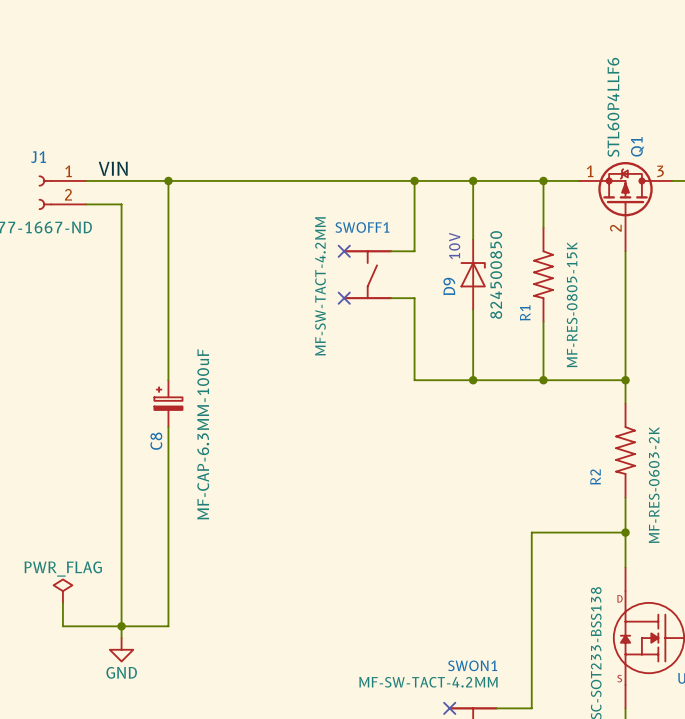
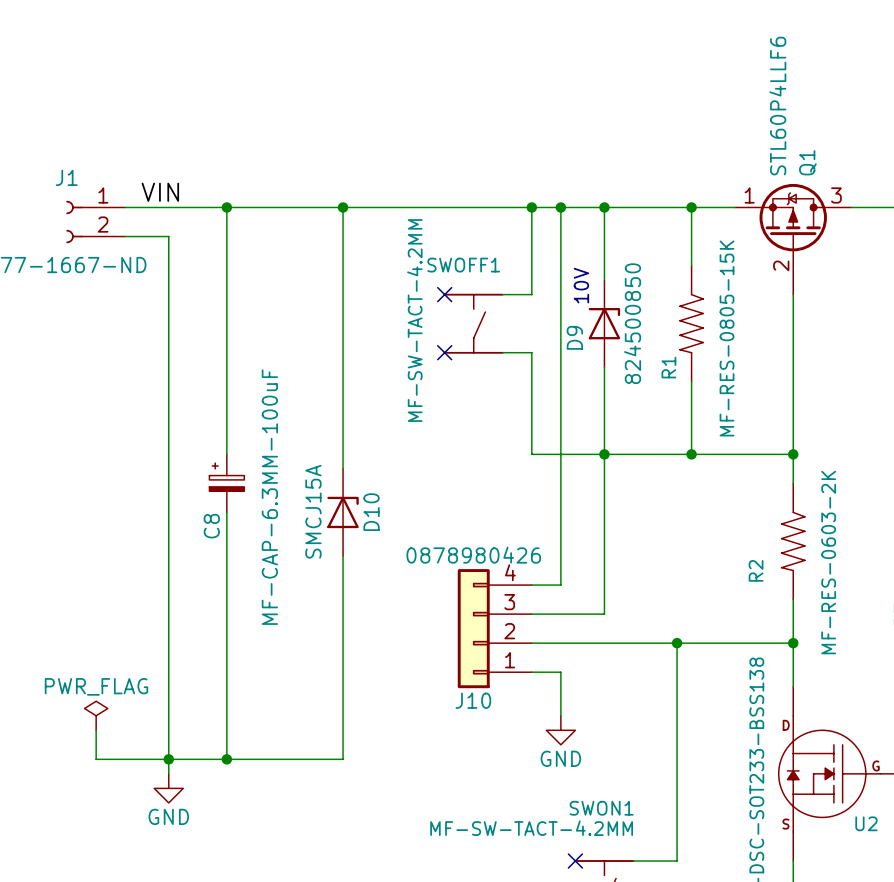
wire: none -> (343, 207) (343, 468)
junction: none -> (343, 207)
wire: none -> (560, 207) (560, 585) (531, 585)
junction: none -> (560, 207)
wire: none -> (604, 454) (604, 614) (531, 614)
D10: none -> SMCJ15A (343, 512)
wire: none -> (343, 556) (343, 759) (226, 759)
J10: none -> 0878980426 (494, 628)
wire: none -> (531, 643) (677, 643)
junction: none -> (677, 643)
wire: none -> (531, 672) (560, 672) (560, 715)
power symbol: none -> GND (560, 730)
junction: none -> (226, 759)

